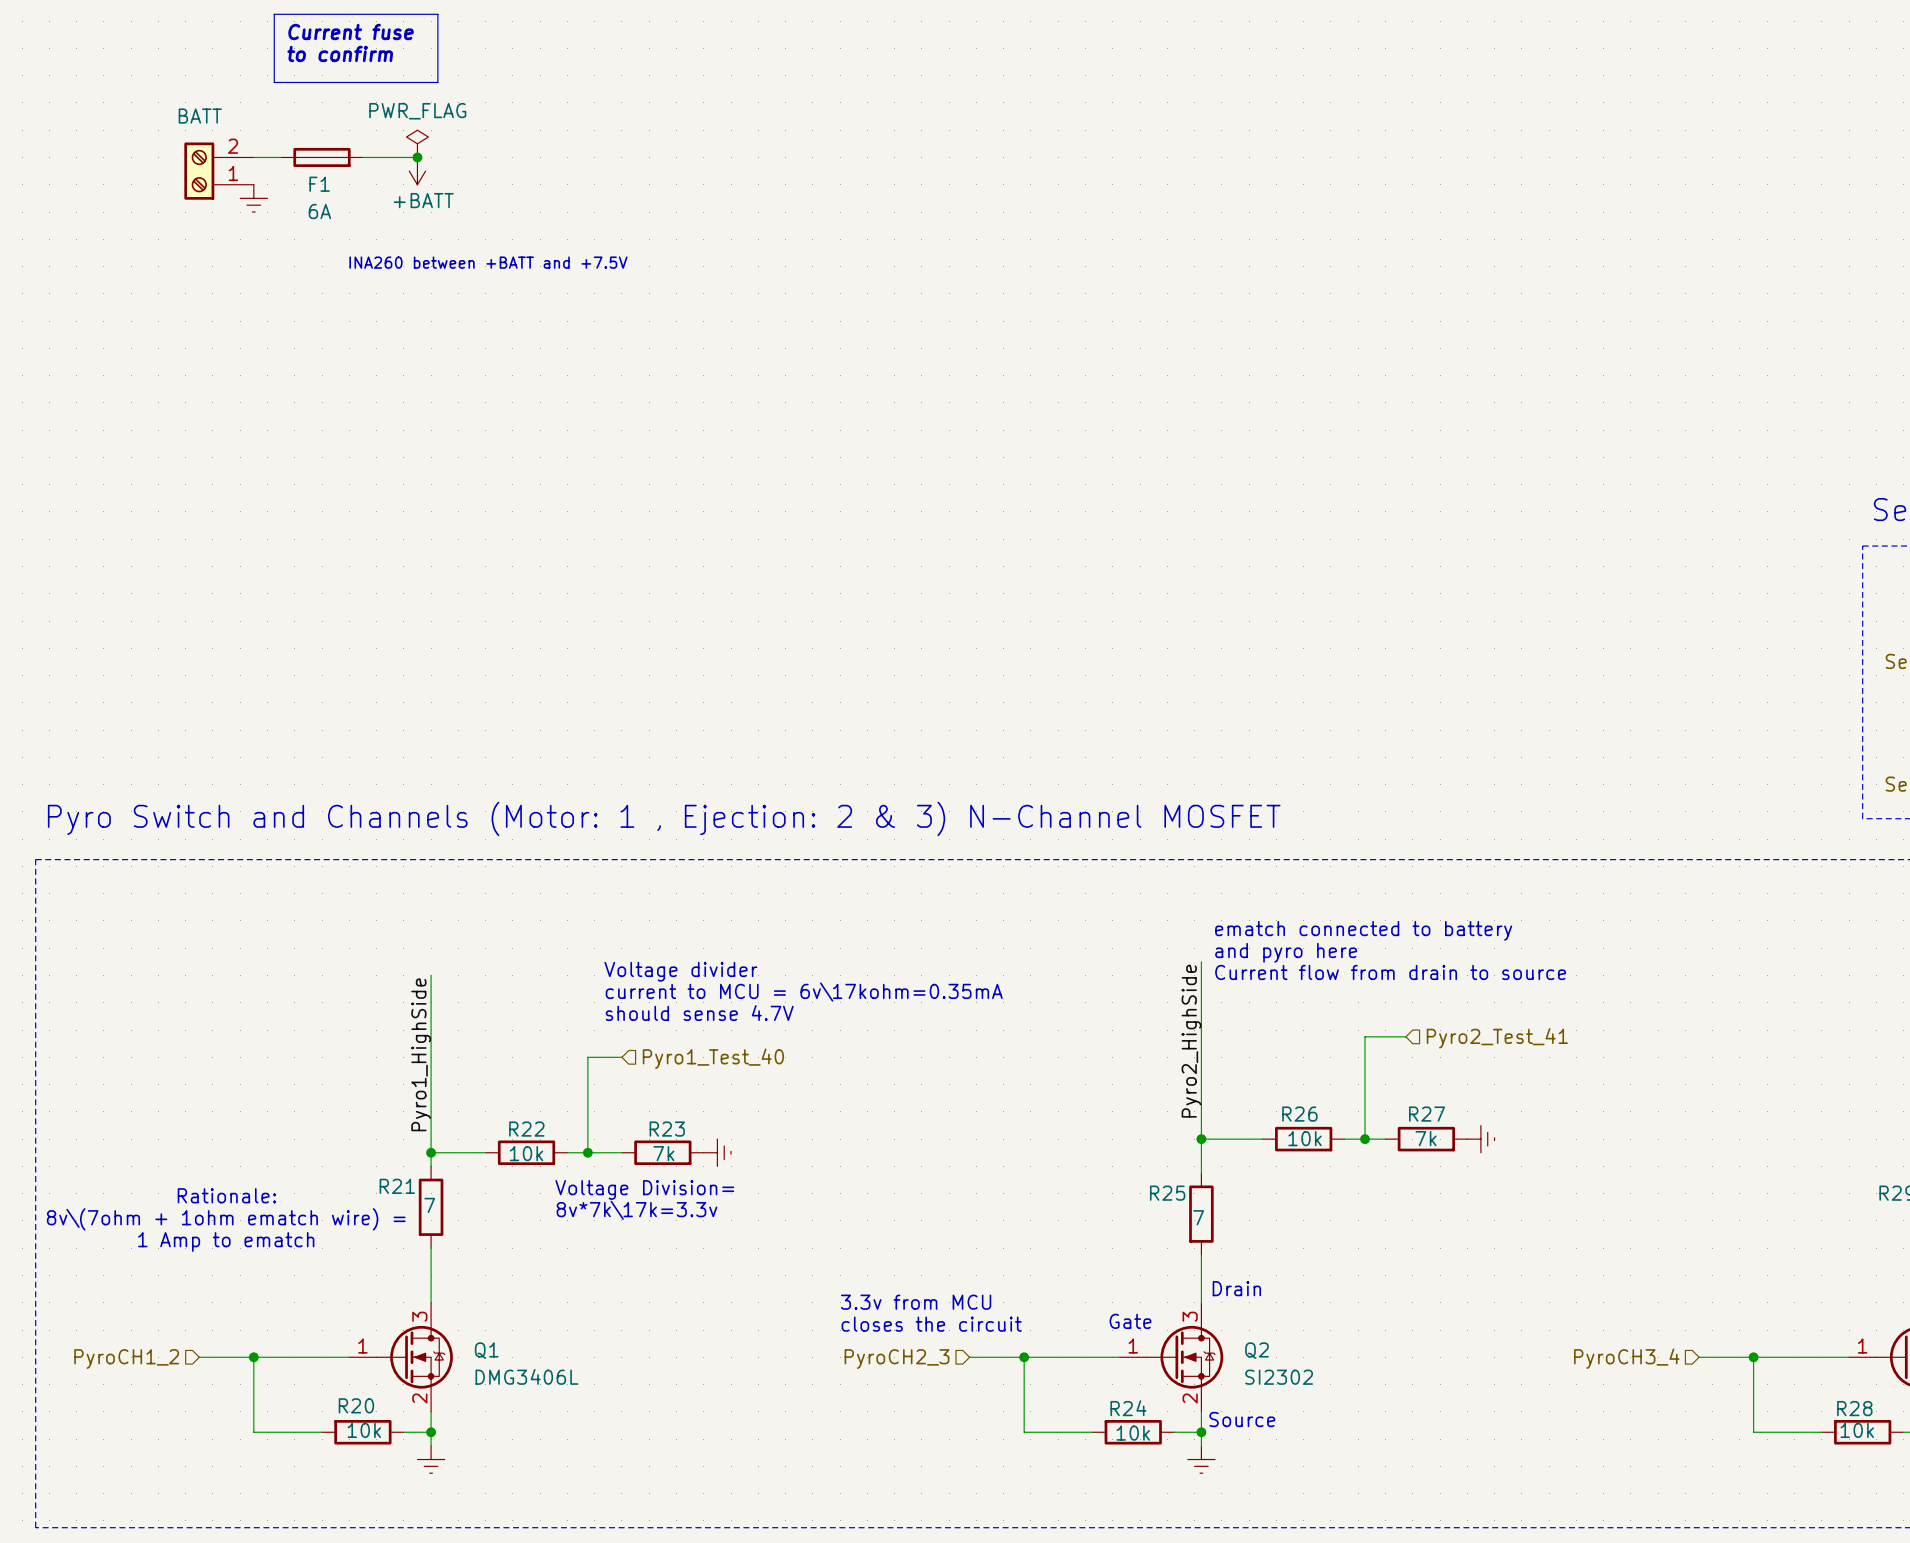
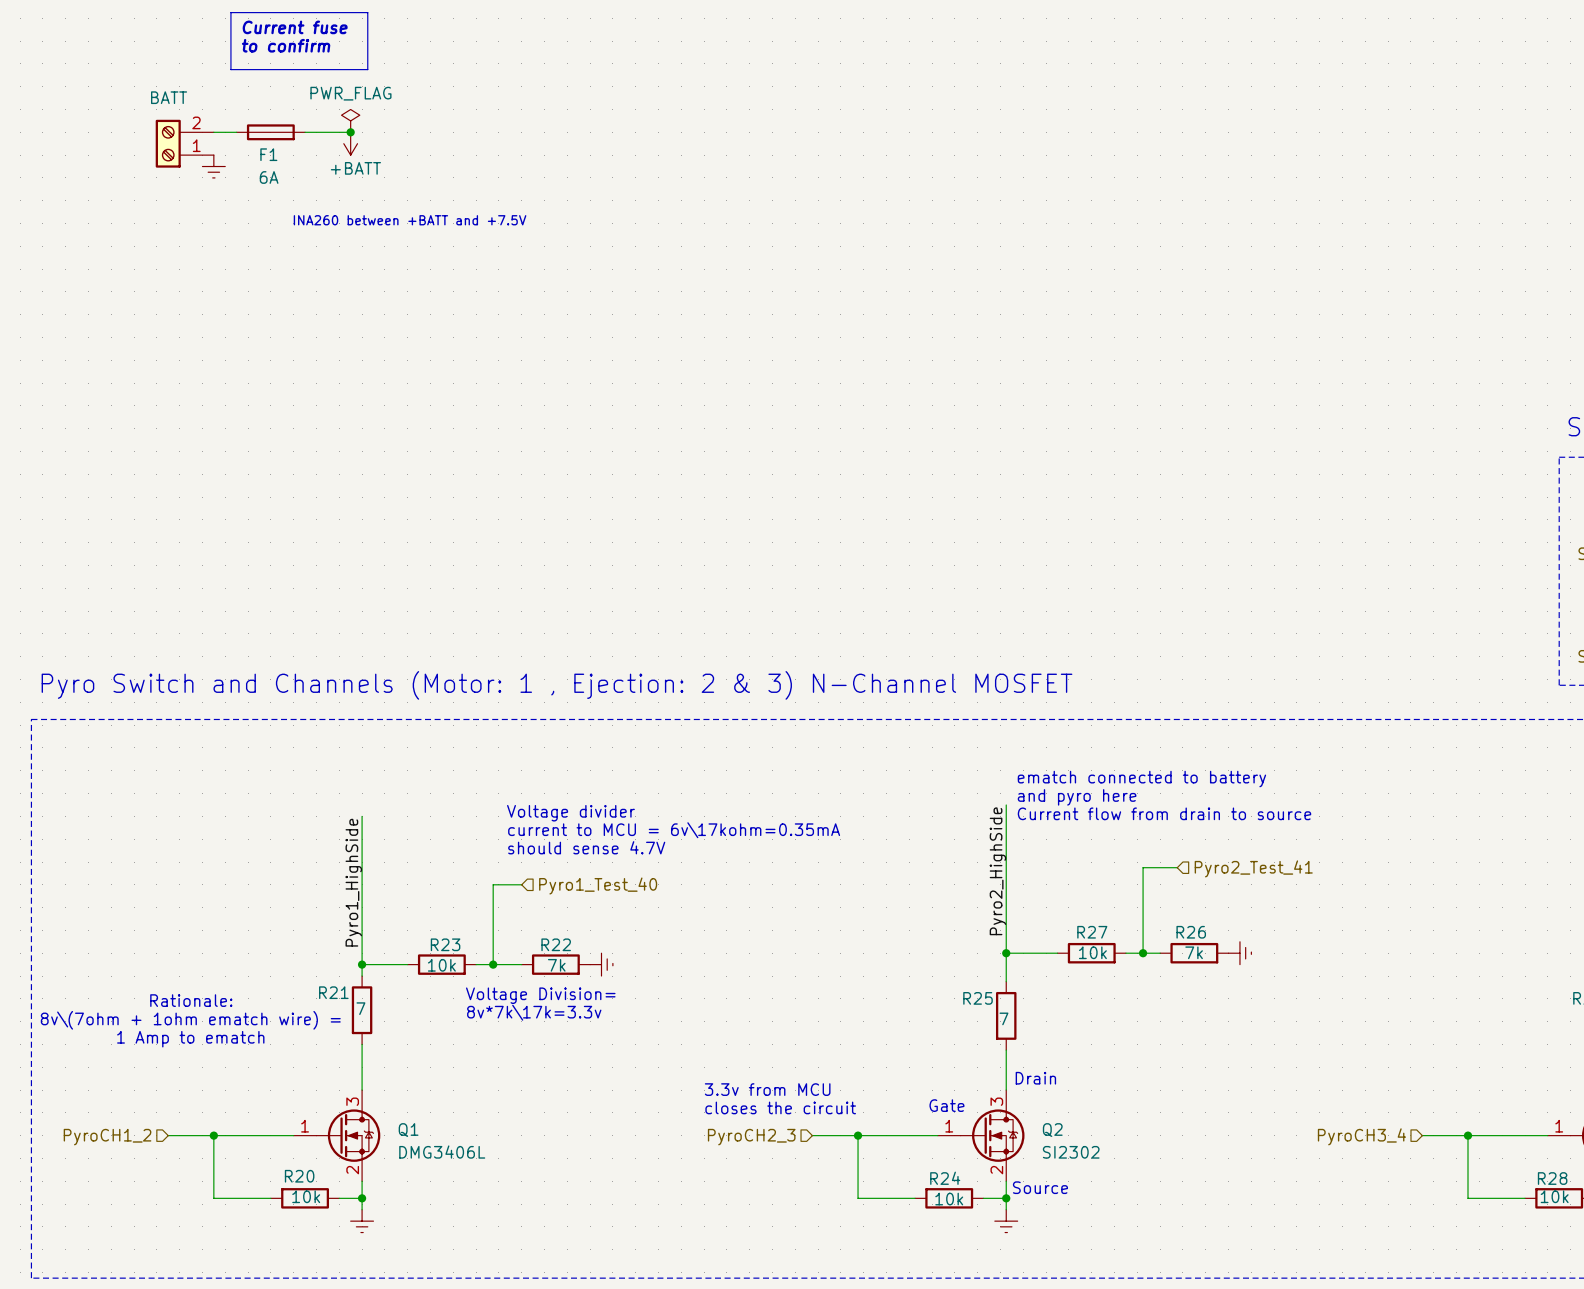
R26 name: R26 (1299, 1114) -> R27 (1092, 932)
R27 name: R27 (1427, 1114) -> R26 (1191, 932)
R22 name: R22 (526, 1129) -> R23 (445, 944)
R23 name: R23 (667, 1129) -> R22 (556, 944)

